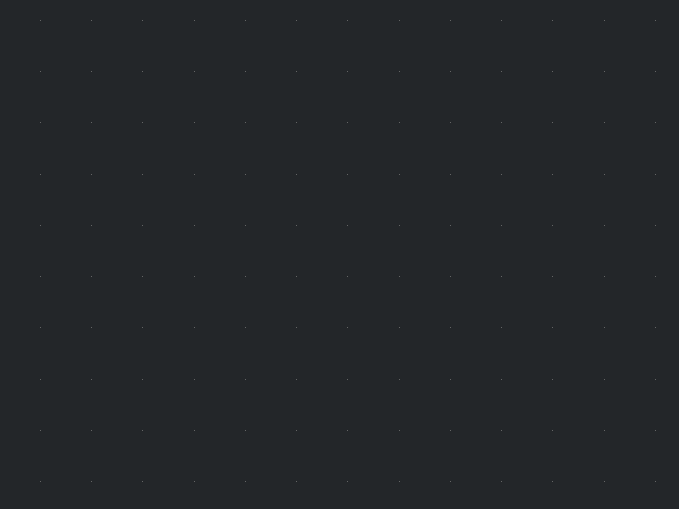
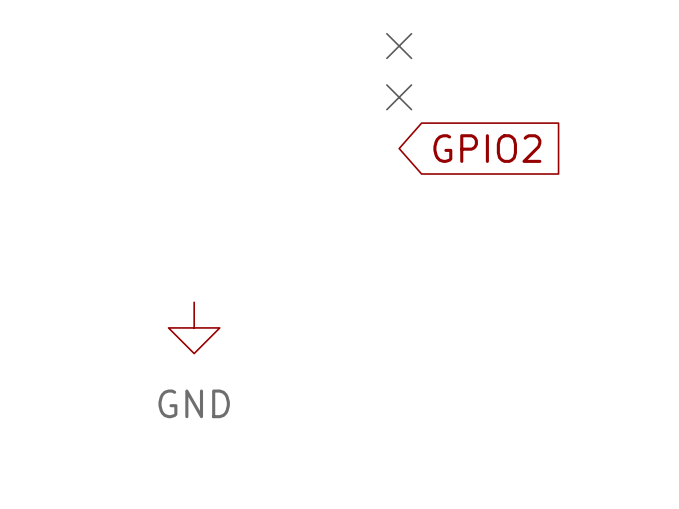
no-connect mark: none -> (399, 46)
no-connect mark: none -> (399, 97)
global label: none -> GPIO2 (487, 148)
power symbol: none -> GND (194, 327)

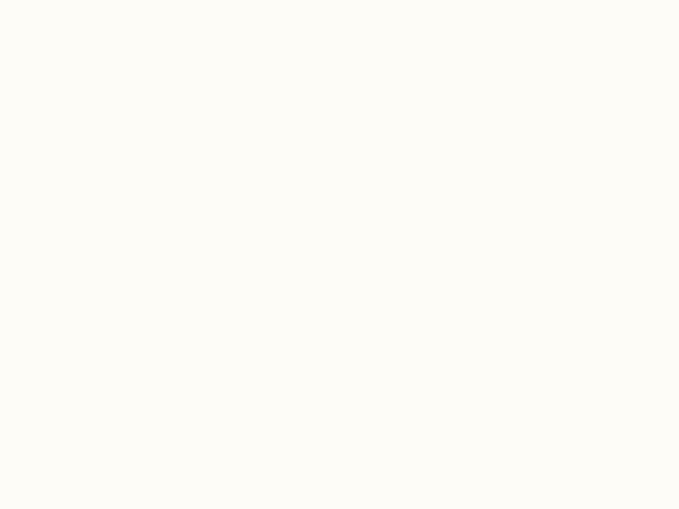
no-connect mark: (399, 46) -> none
no-connect mark: (399, 97) -> none
global label: GPIO2 (487, 148) -> none
power symbol: GND (194, 327) -> none

